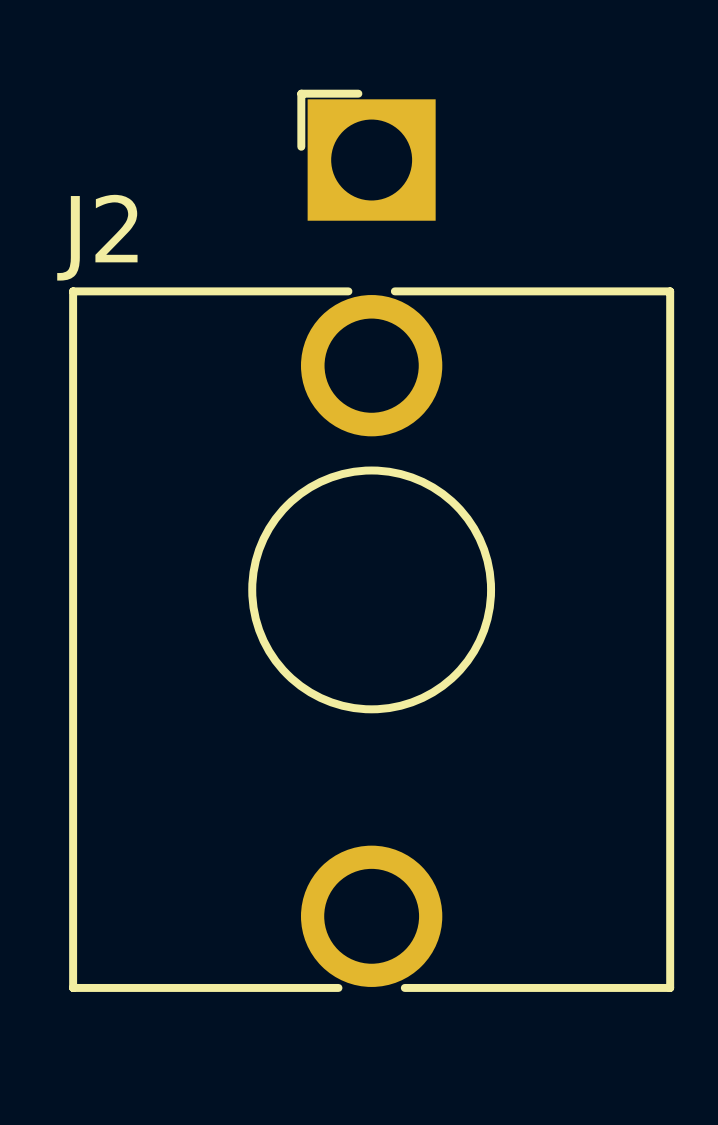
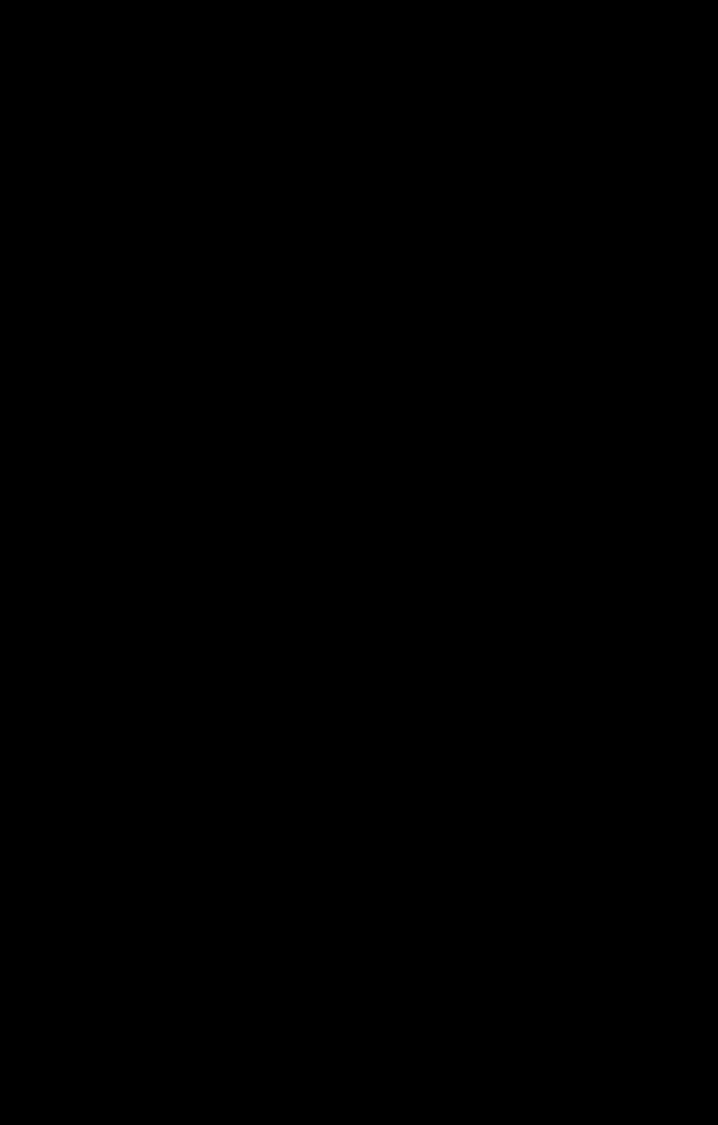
J2: (371, 540) -> none

